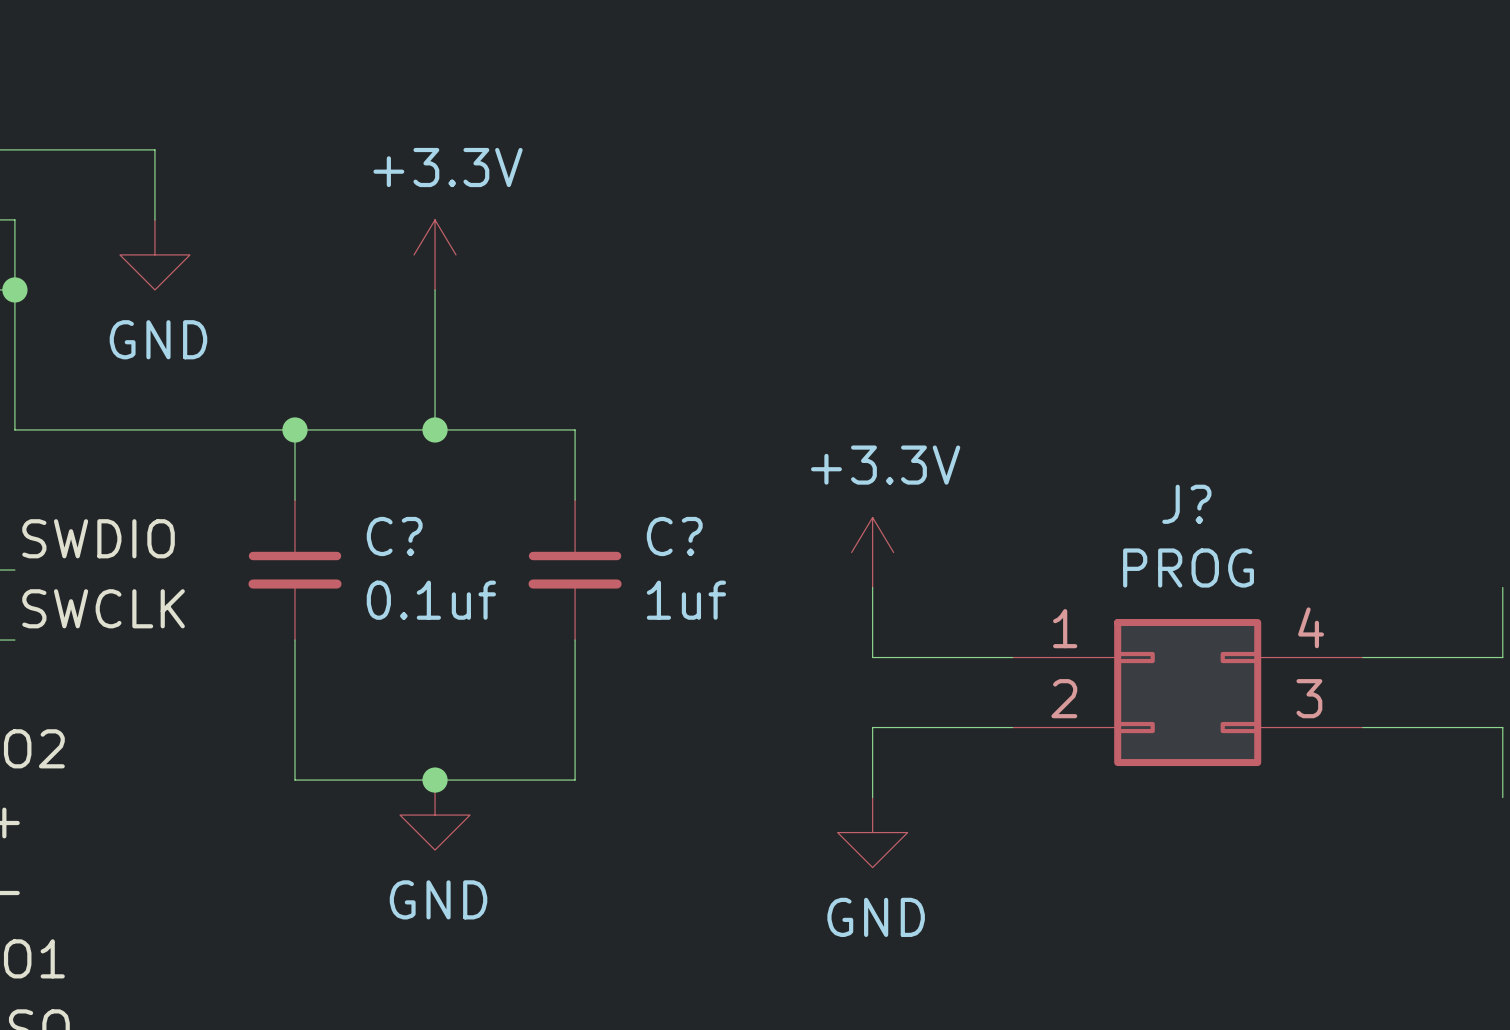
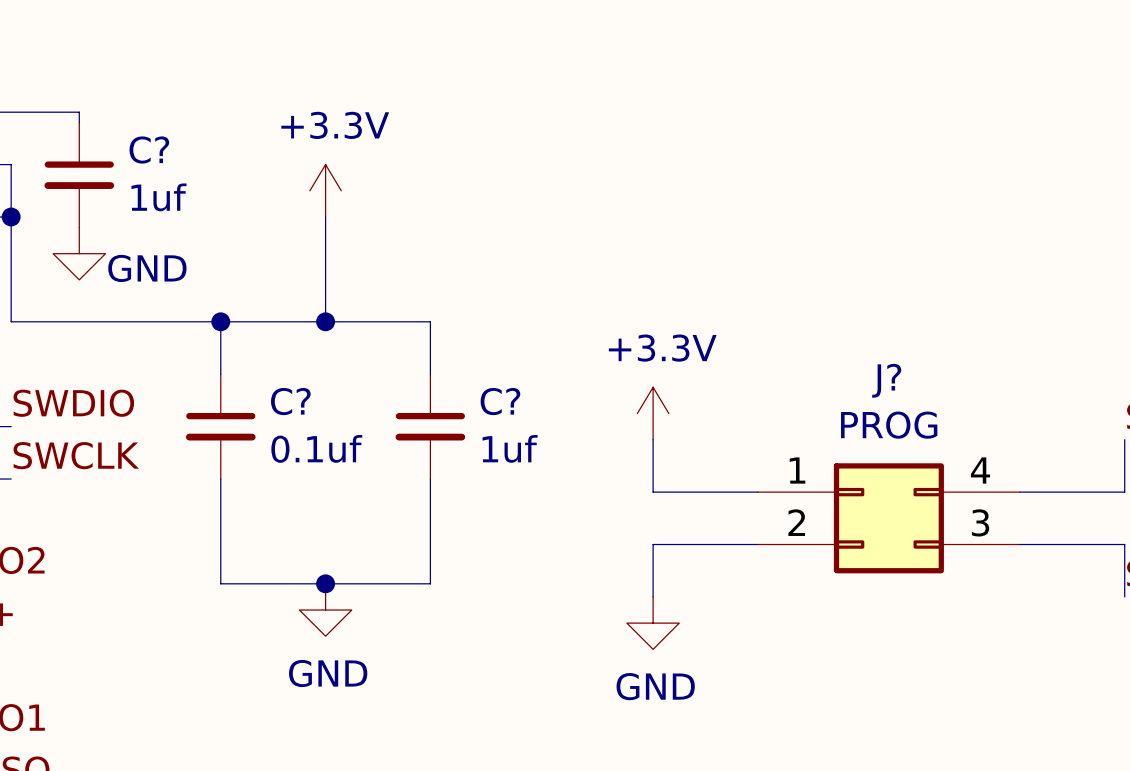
wire: (105, 149) (154, 149) (154, 219) -> (79, 112) (79, 122)
C?: none -> 1uf (79, 175)
power symbol position: GND (154, 254) -> GND (79, 253)
power symbol text position: GND (158, 339) -> GND (147, 268)

